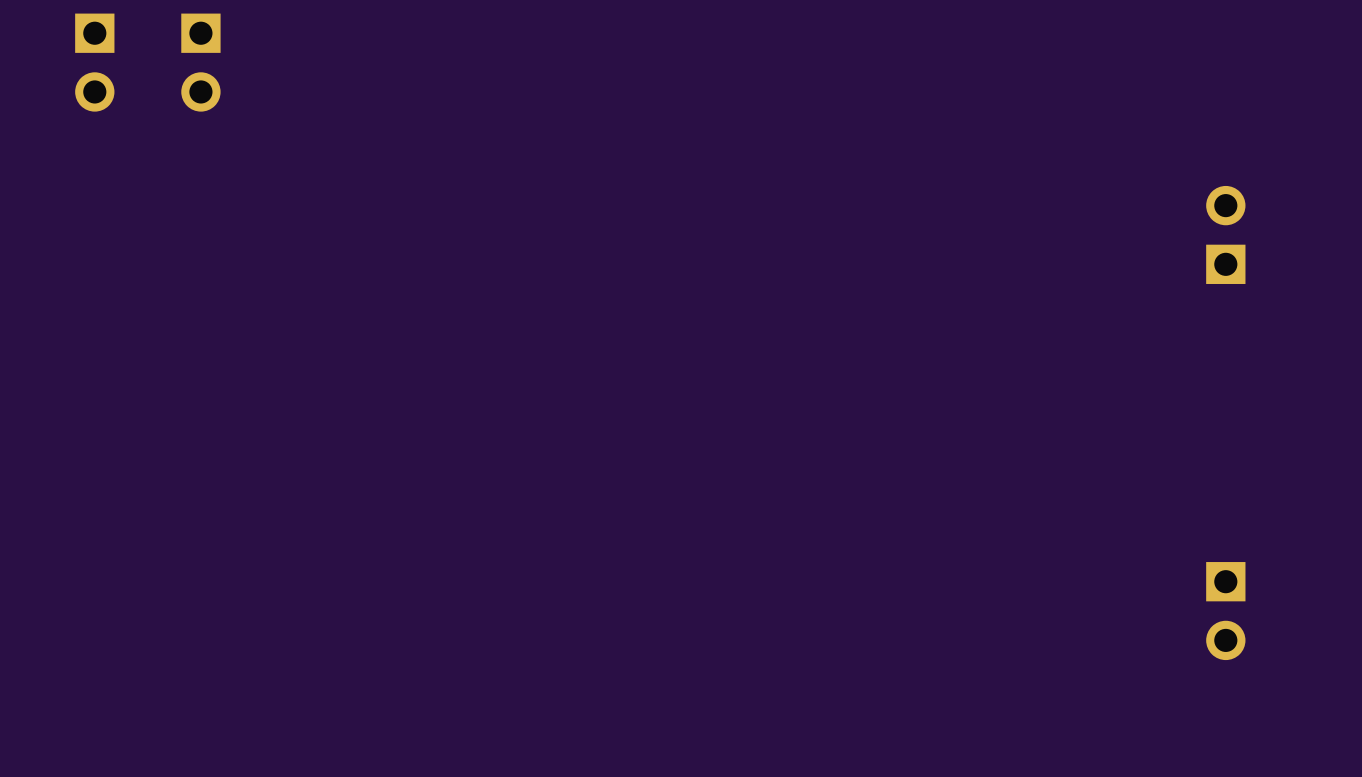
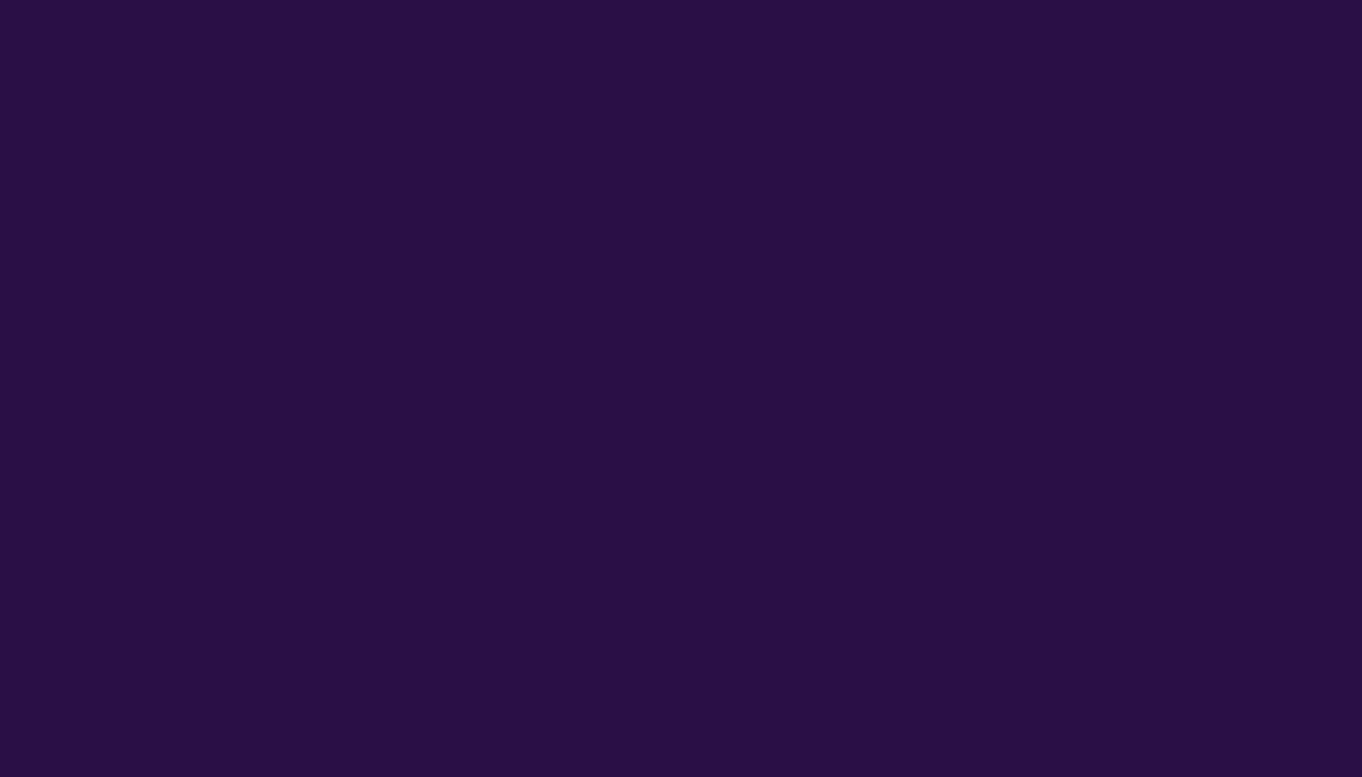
part: (94, 62) -> none
part: (200, 62) -> none
part: (1225, 234) -> none
part: (1225, 611) -> none

